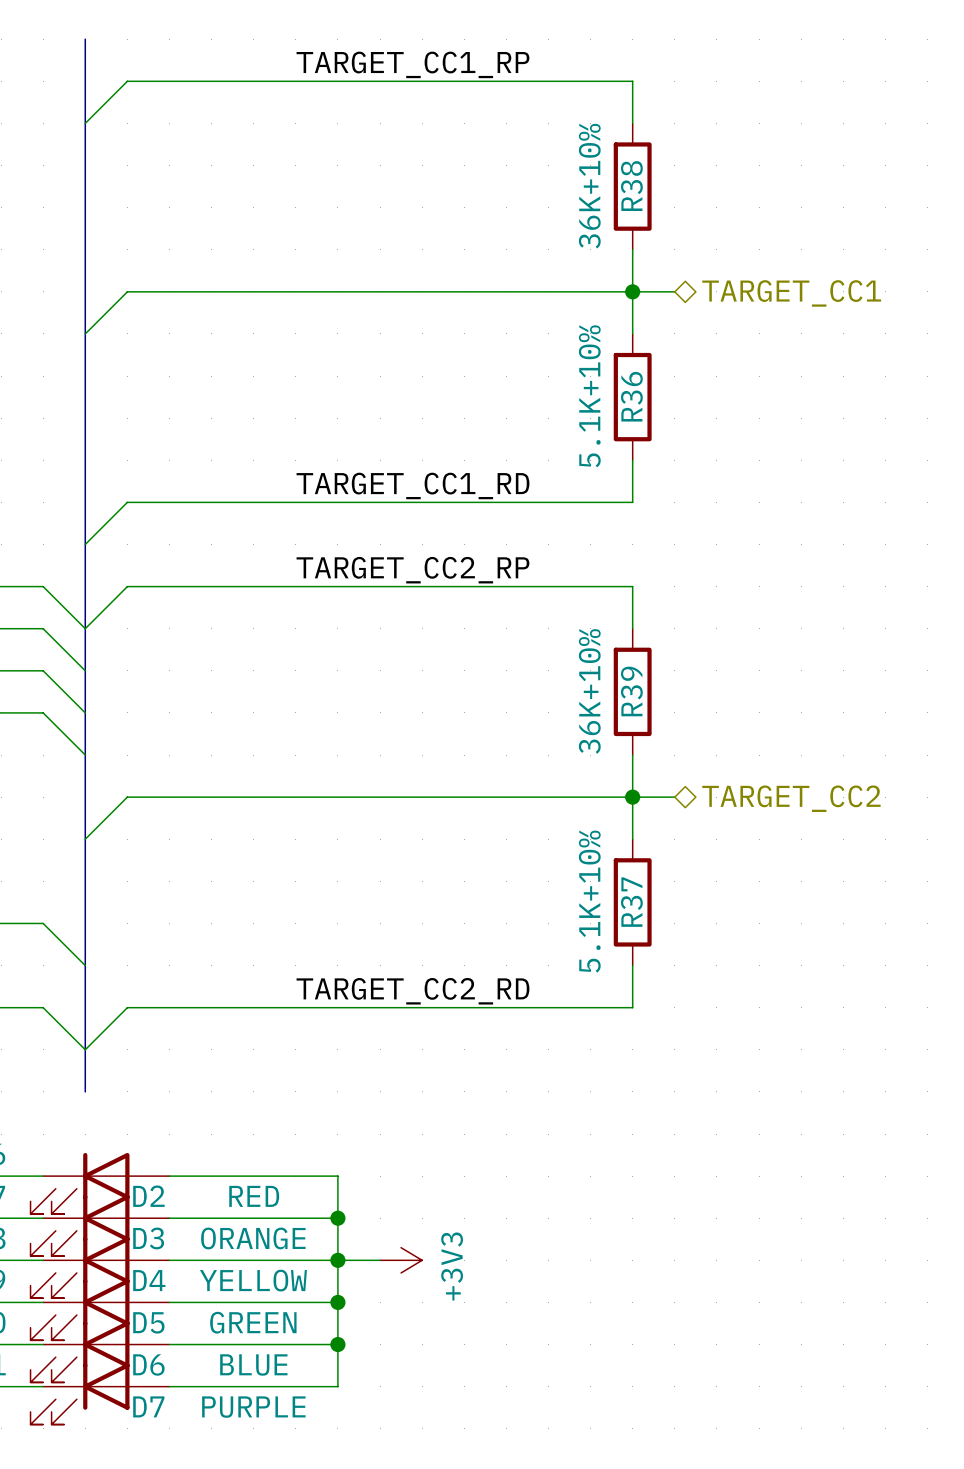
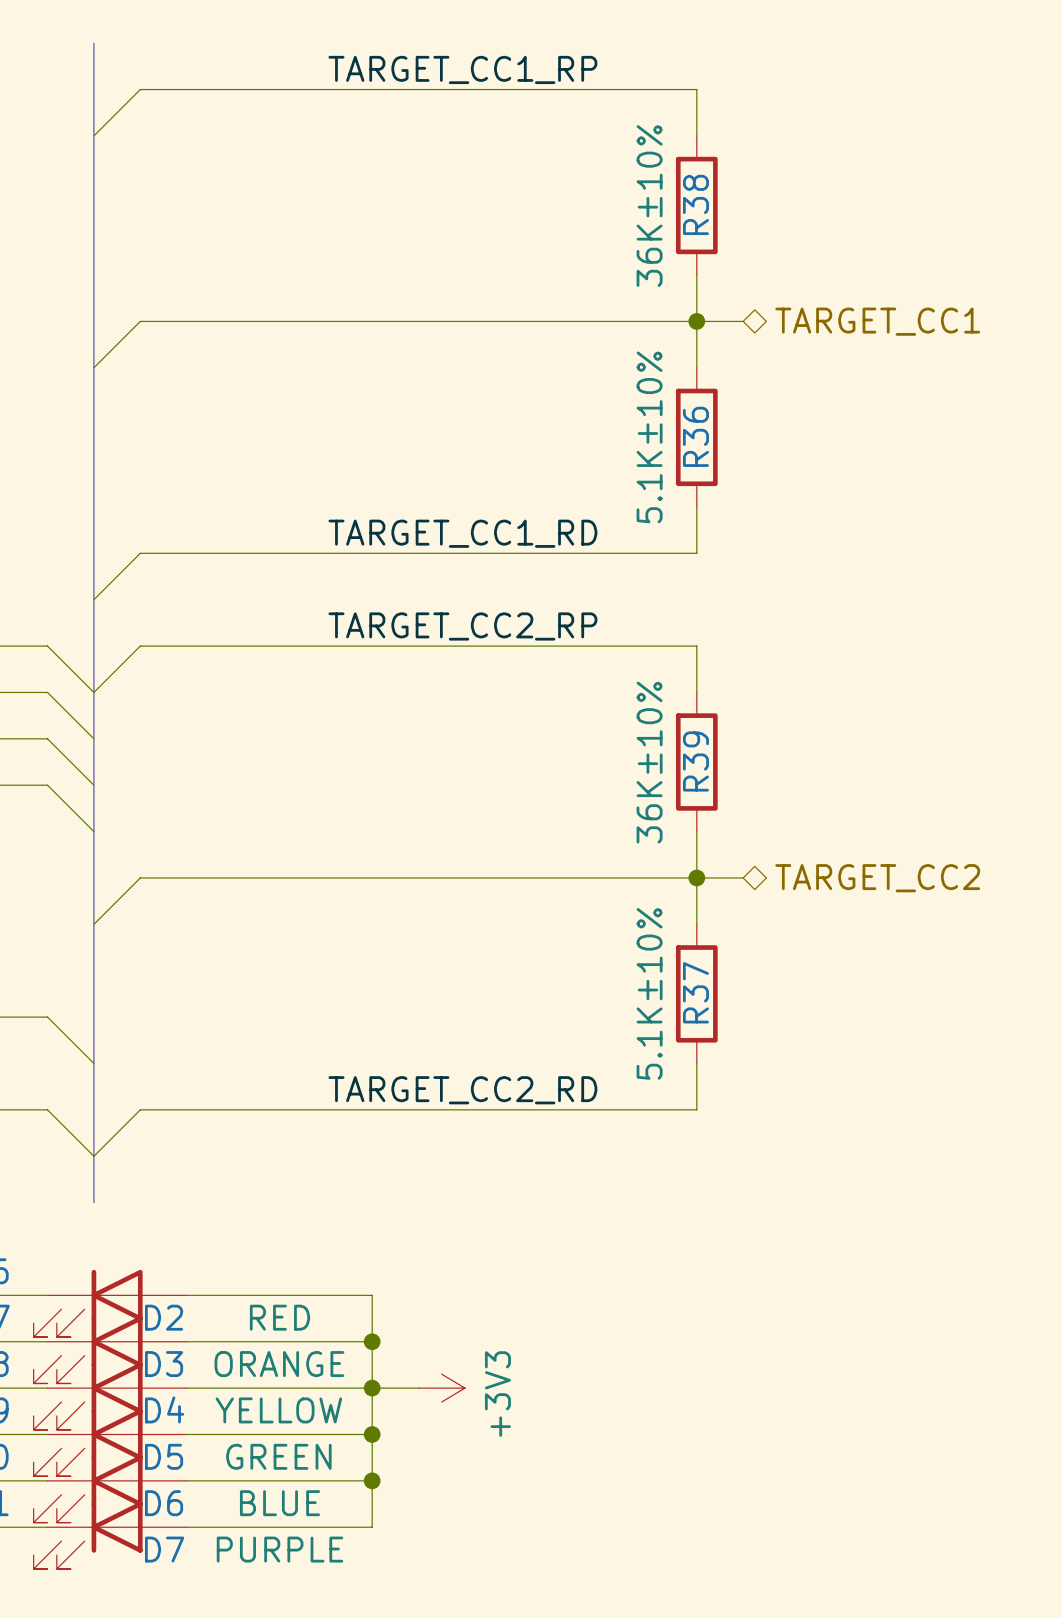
R38 value: 36K+10% (589, 186) -> 36K±10% (649, 206)
R36 value: 5.1K+10% (589, 396) -> 5.1K±10% (649, 437)
R39 value: 36K+10% (589, 691) -> 36K±10% (649, 762)
R37 value: 5.1K+10% (589, 901) -> 5.1K±10% (649, 993)

